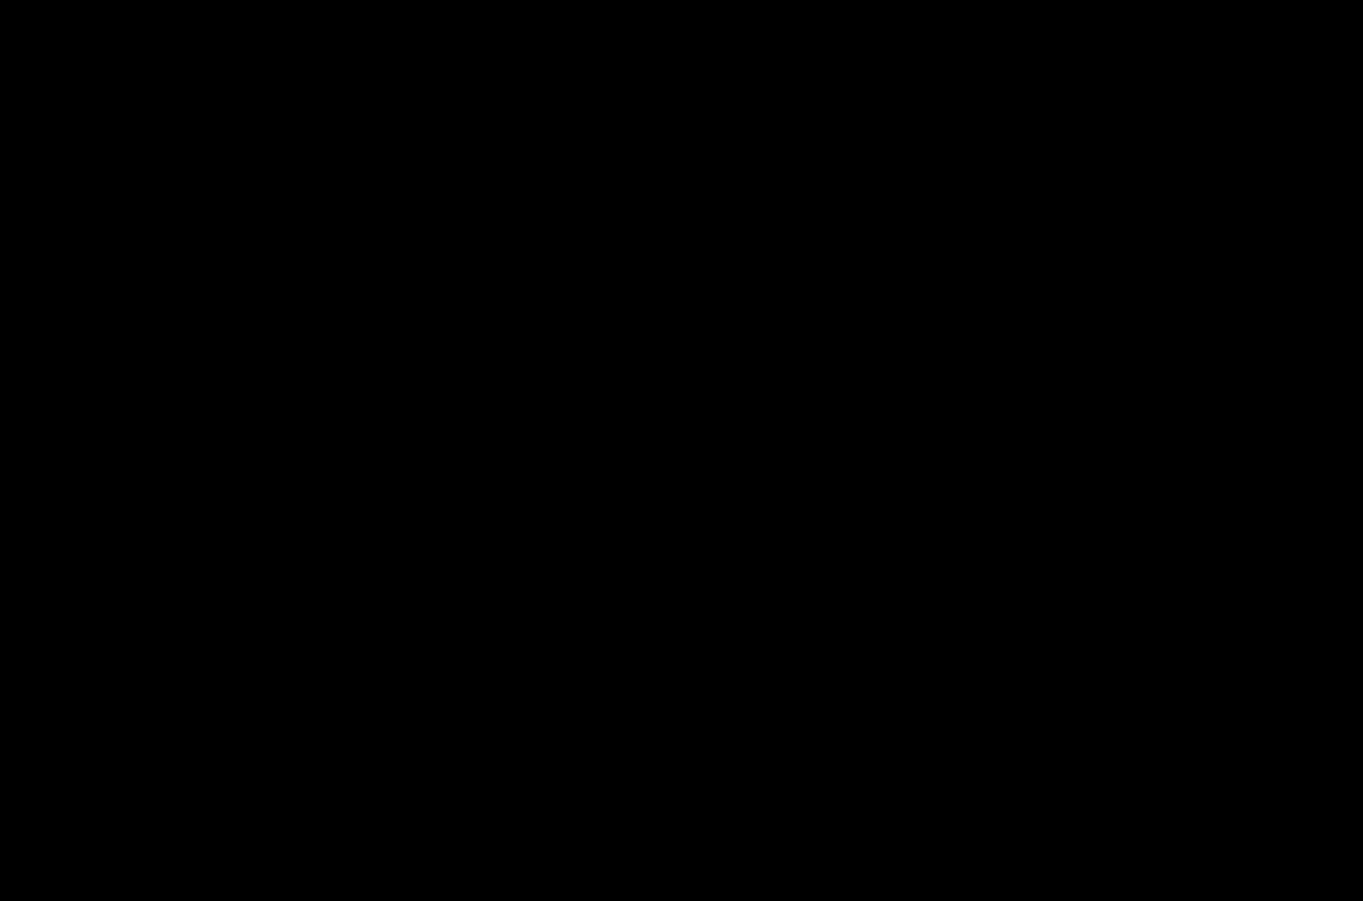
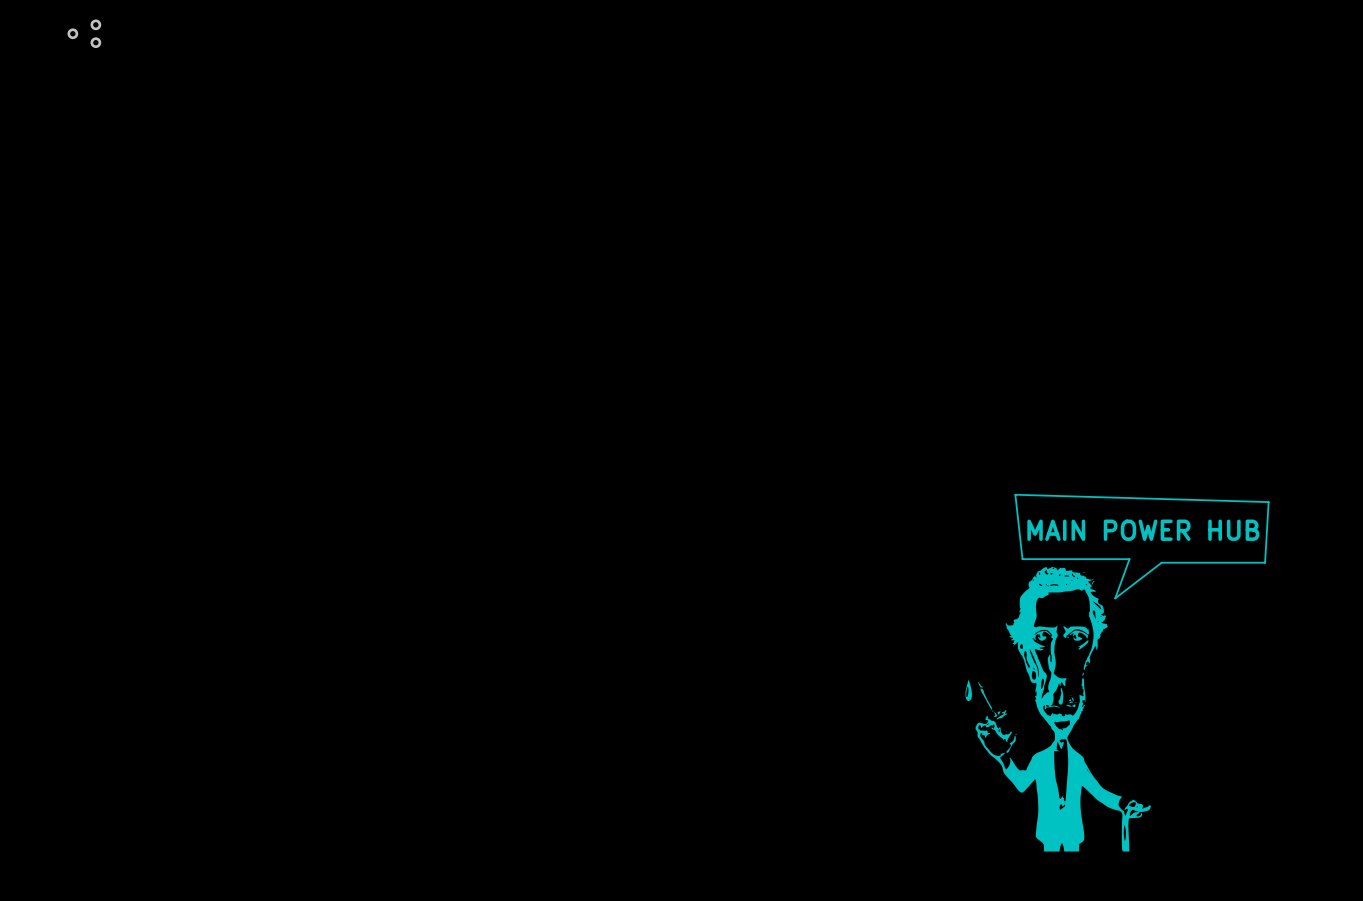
via: none -> (95, 24)
via: none -> (72, 33)
via: none -> (95, 42)
line: none -> (1015, 494) (1022, 559) (1129, 559) (1115, 598) (1161, 562) (1265, 562) (1268, 502) (1015, 494)
text: none -> MAIN POWER HUB (1143, 530)
drawing: none -> [965, 566, 1151, 852]

